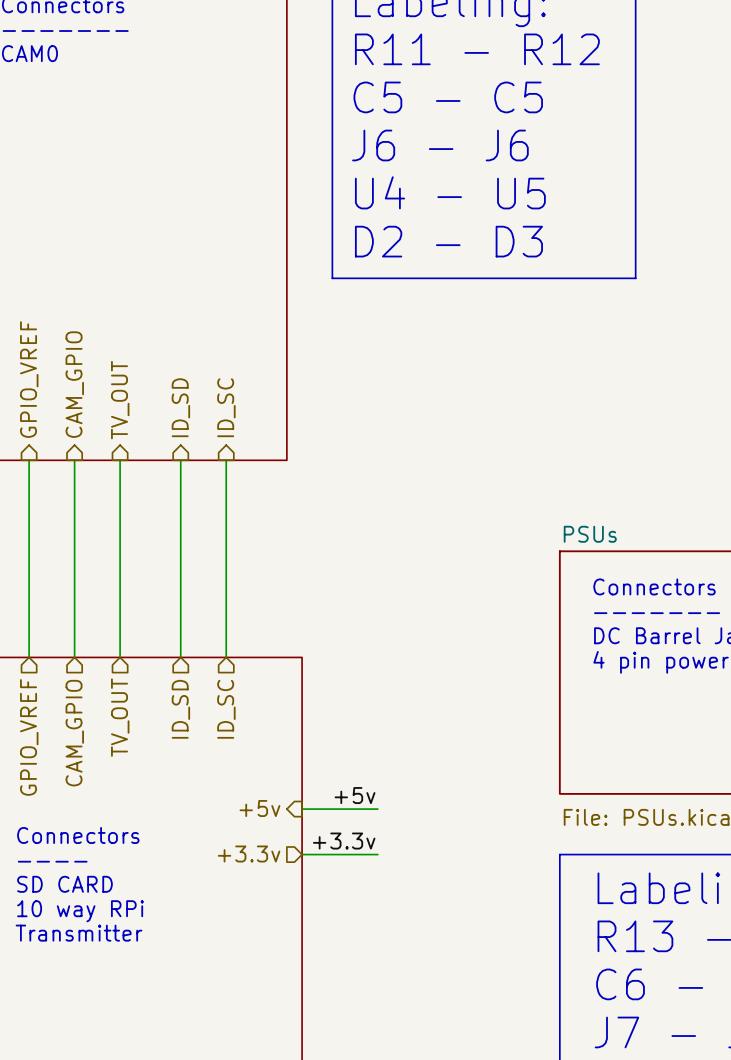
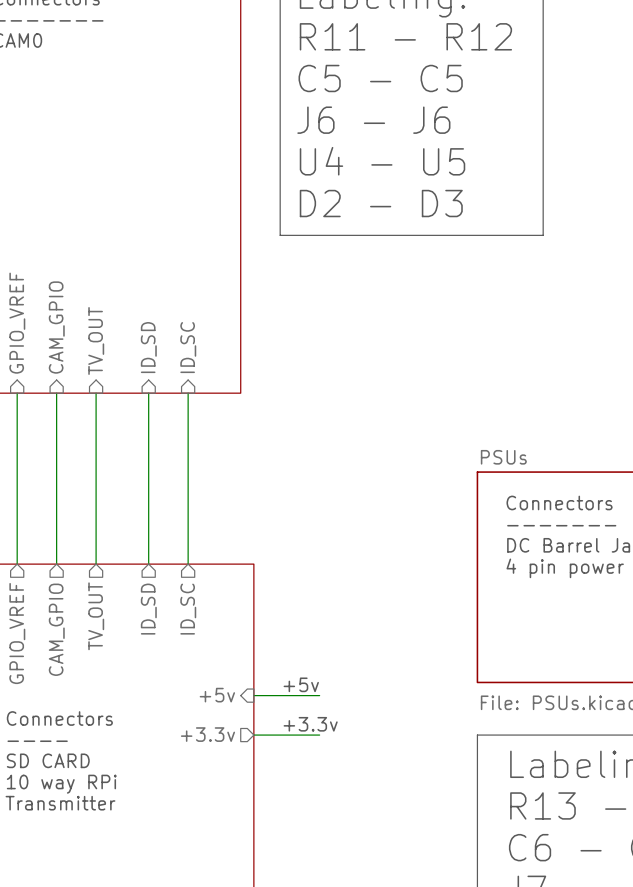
label: +5v (355, 795) -> none
text: none -> +5v (301, 684)
label: +3.3v (344, 841) -> none
text: none -> +3.3v (310, 724)

